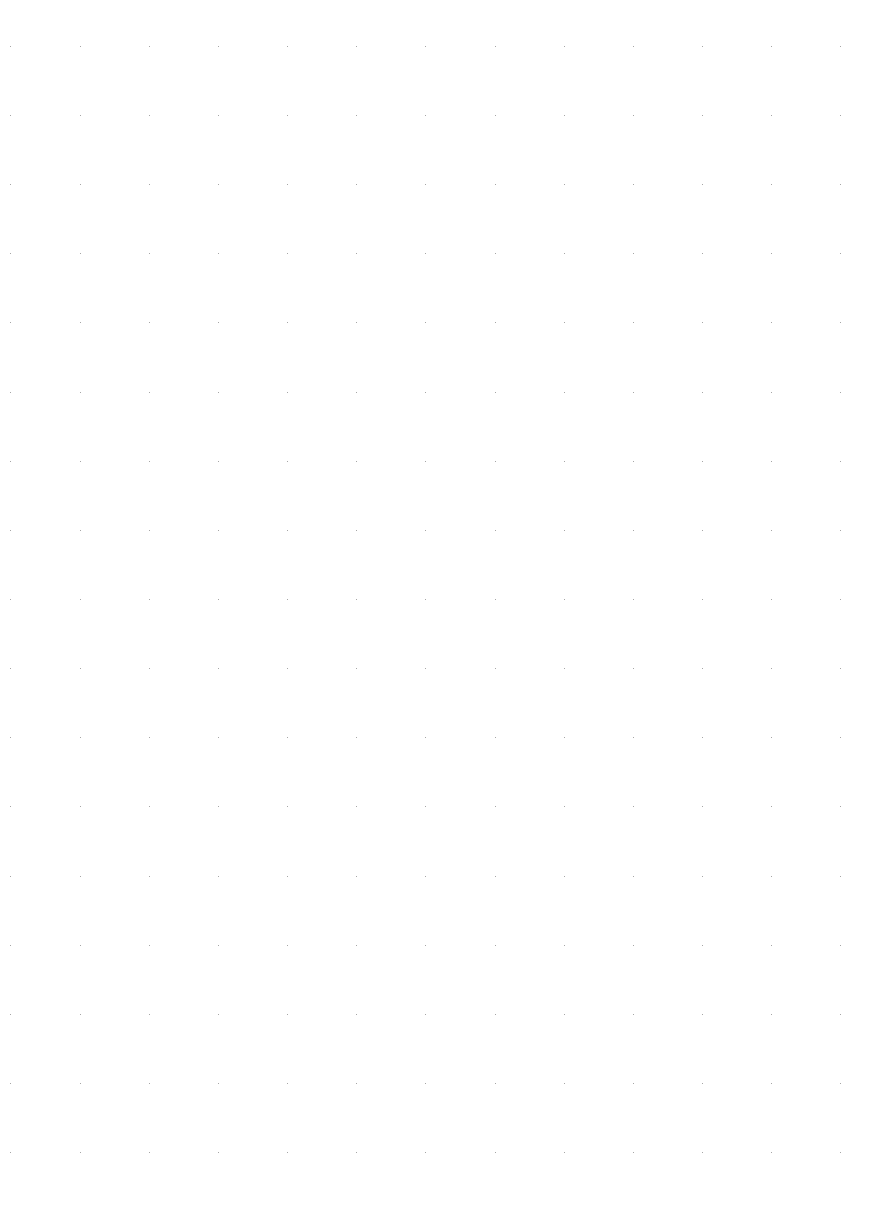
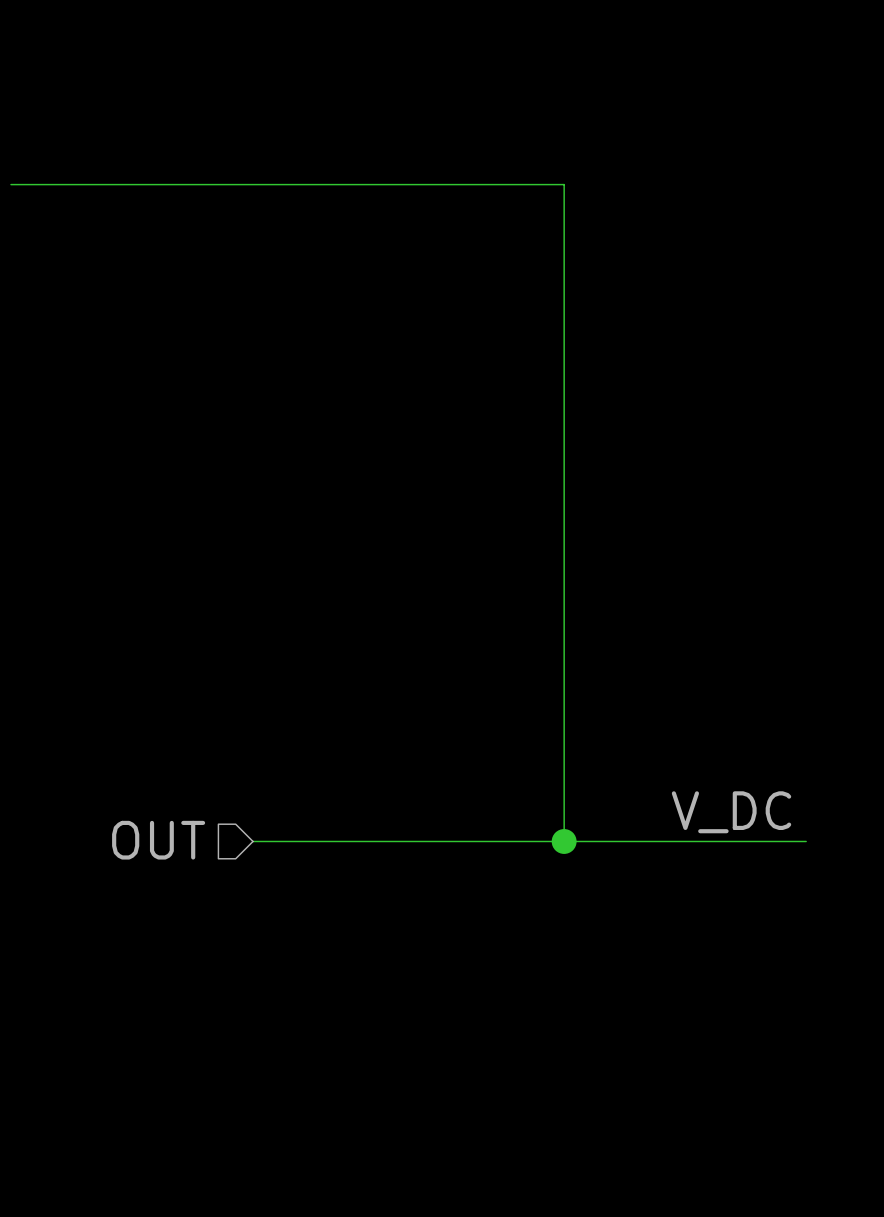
wire: none -> (10, 184) (564, 184) (564, 841)
label: none -> V_DC (731, 812)
sheet pin: none -> OUT (158, 840)
wire: none -> (252, 841) (806, 841)
junction: none -> (564, 841)

